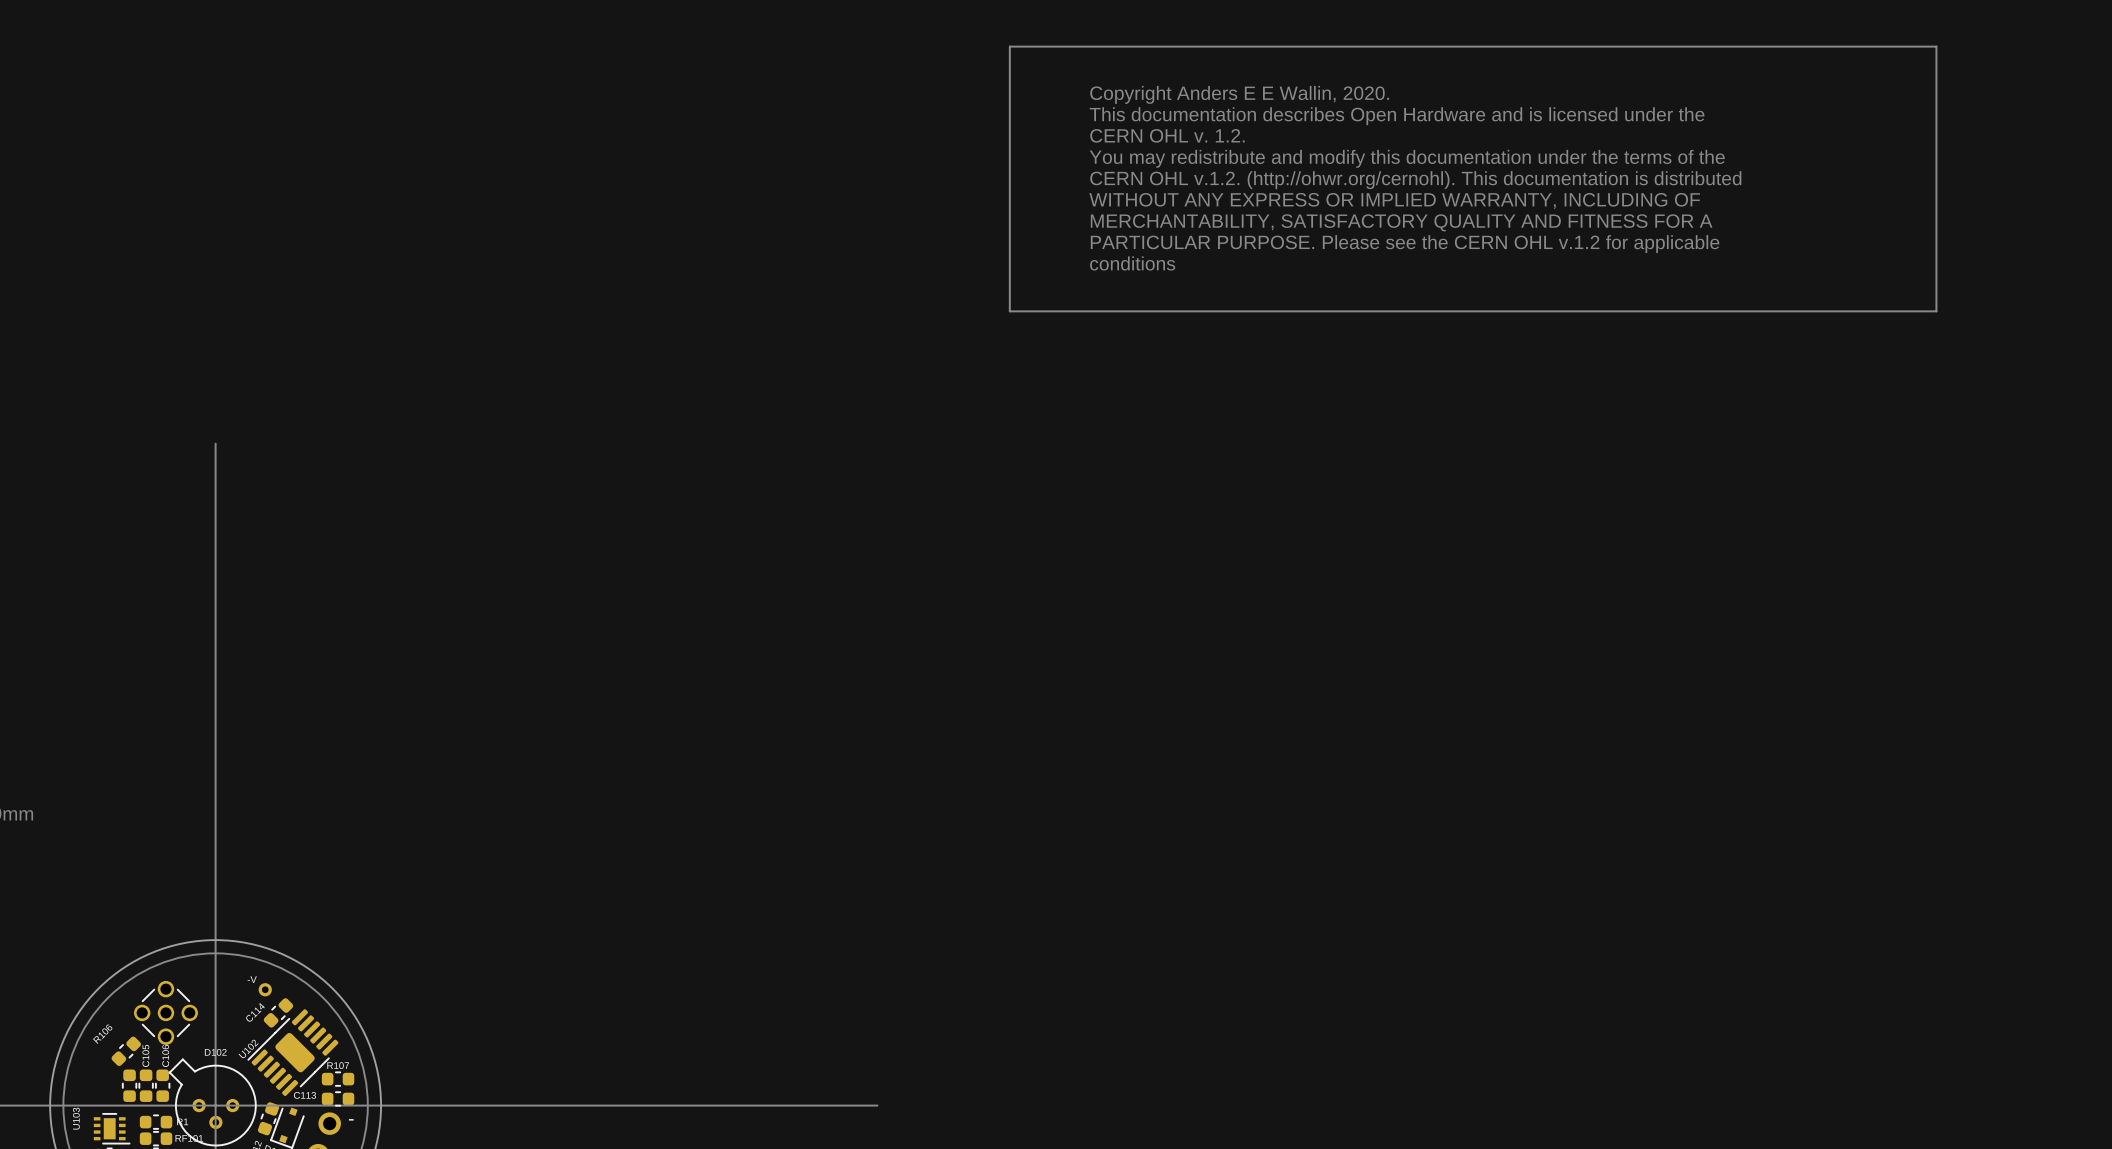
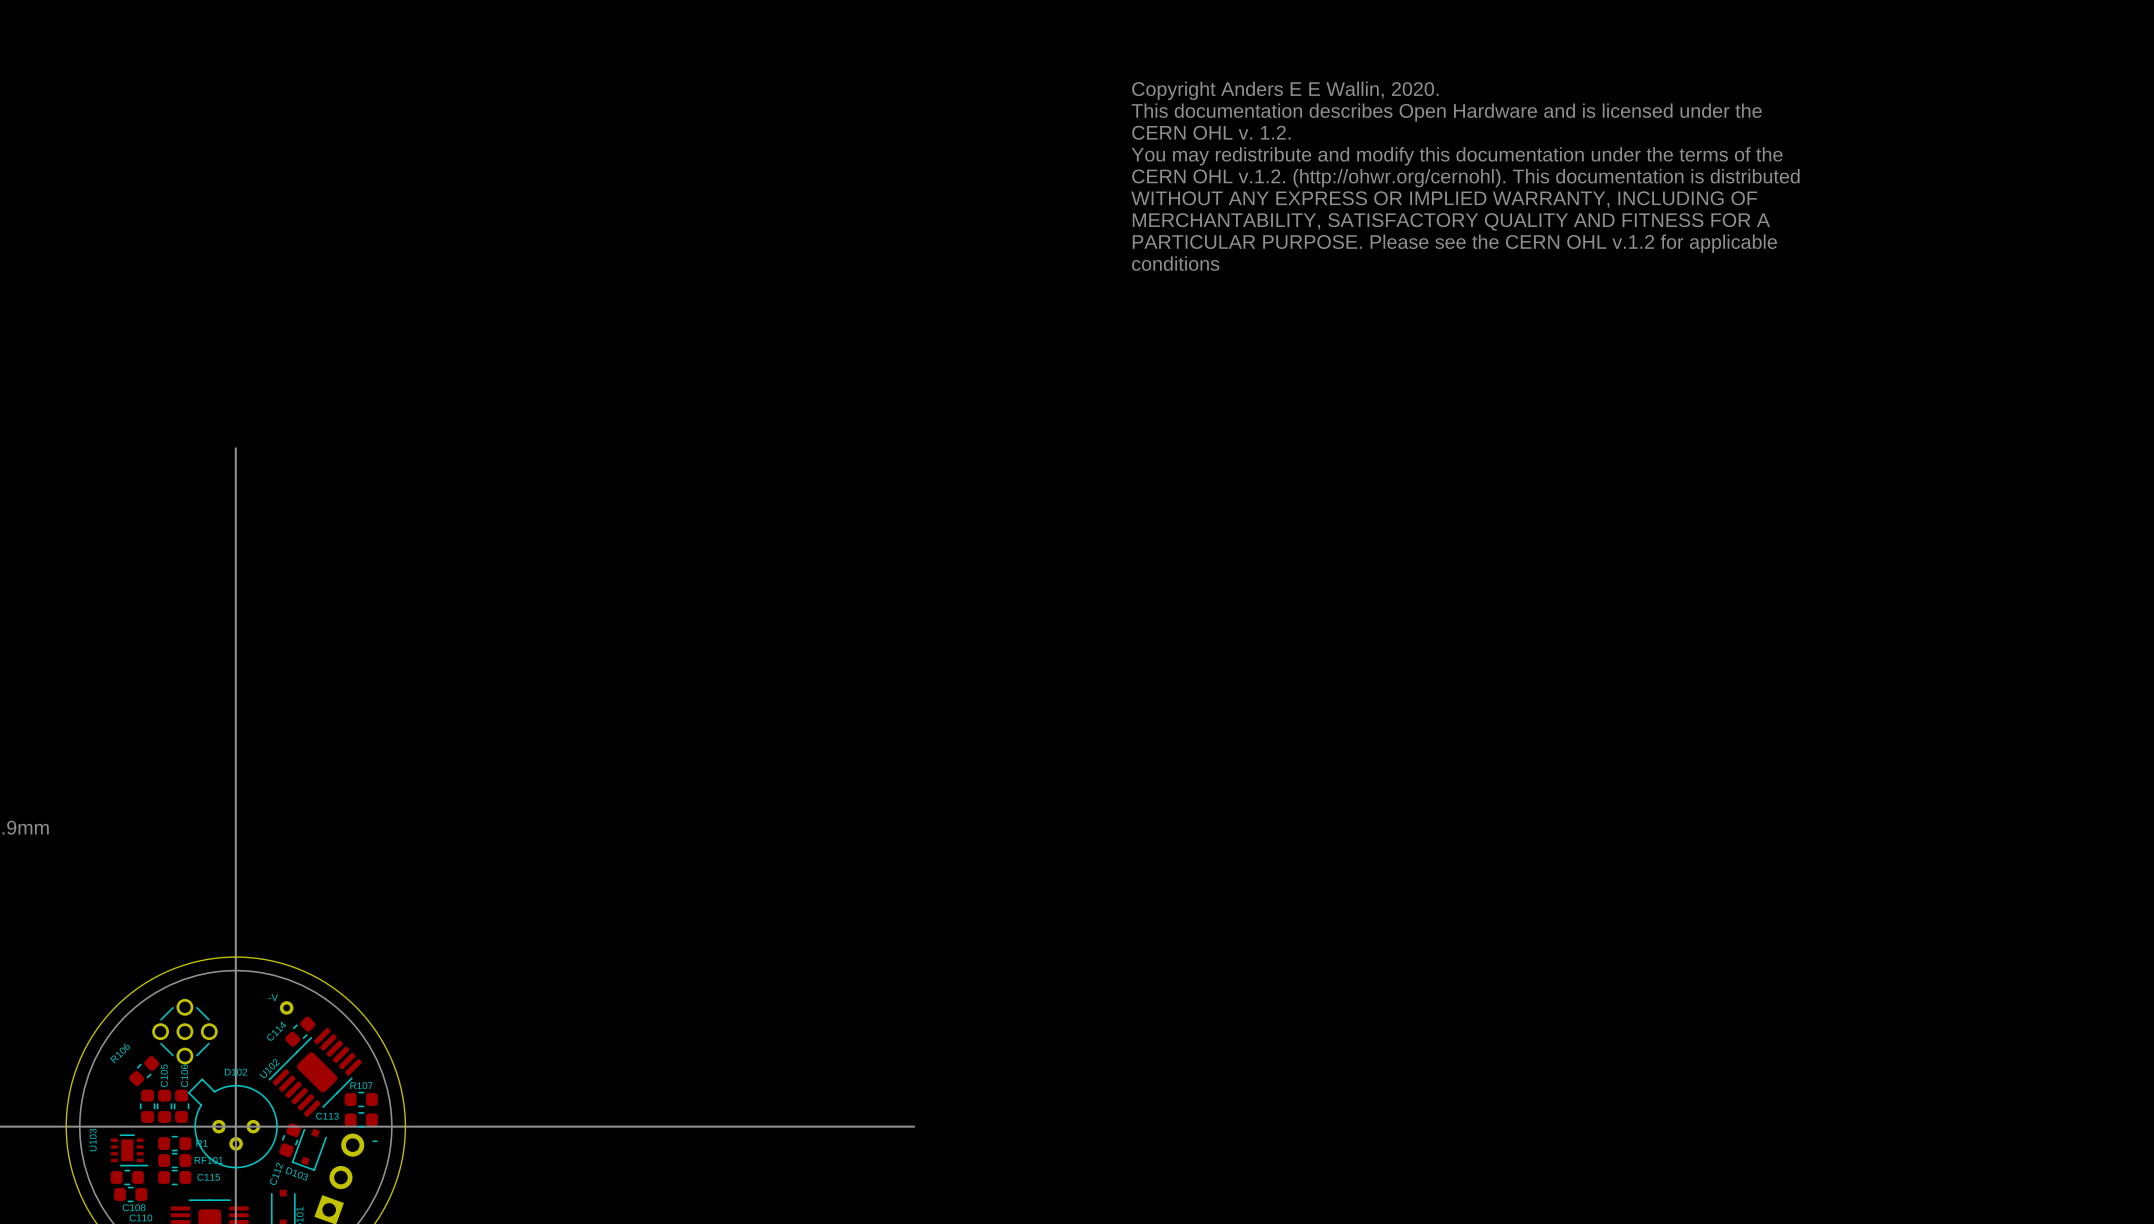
line: (1009, 46) (1009, 311) (1936, 311) (1936, 46) (1009, 46) -> none

